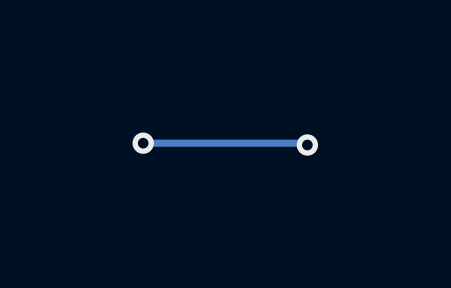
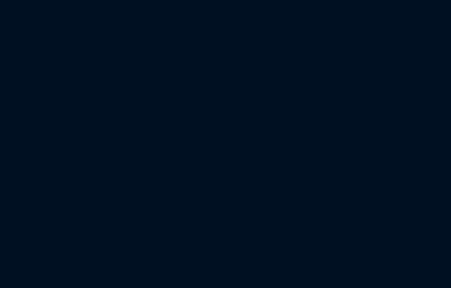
track: (143, 143) (305, 143) (307, 144) -> none
via: (143, 143) -> none
via: (307, 144) -> none

